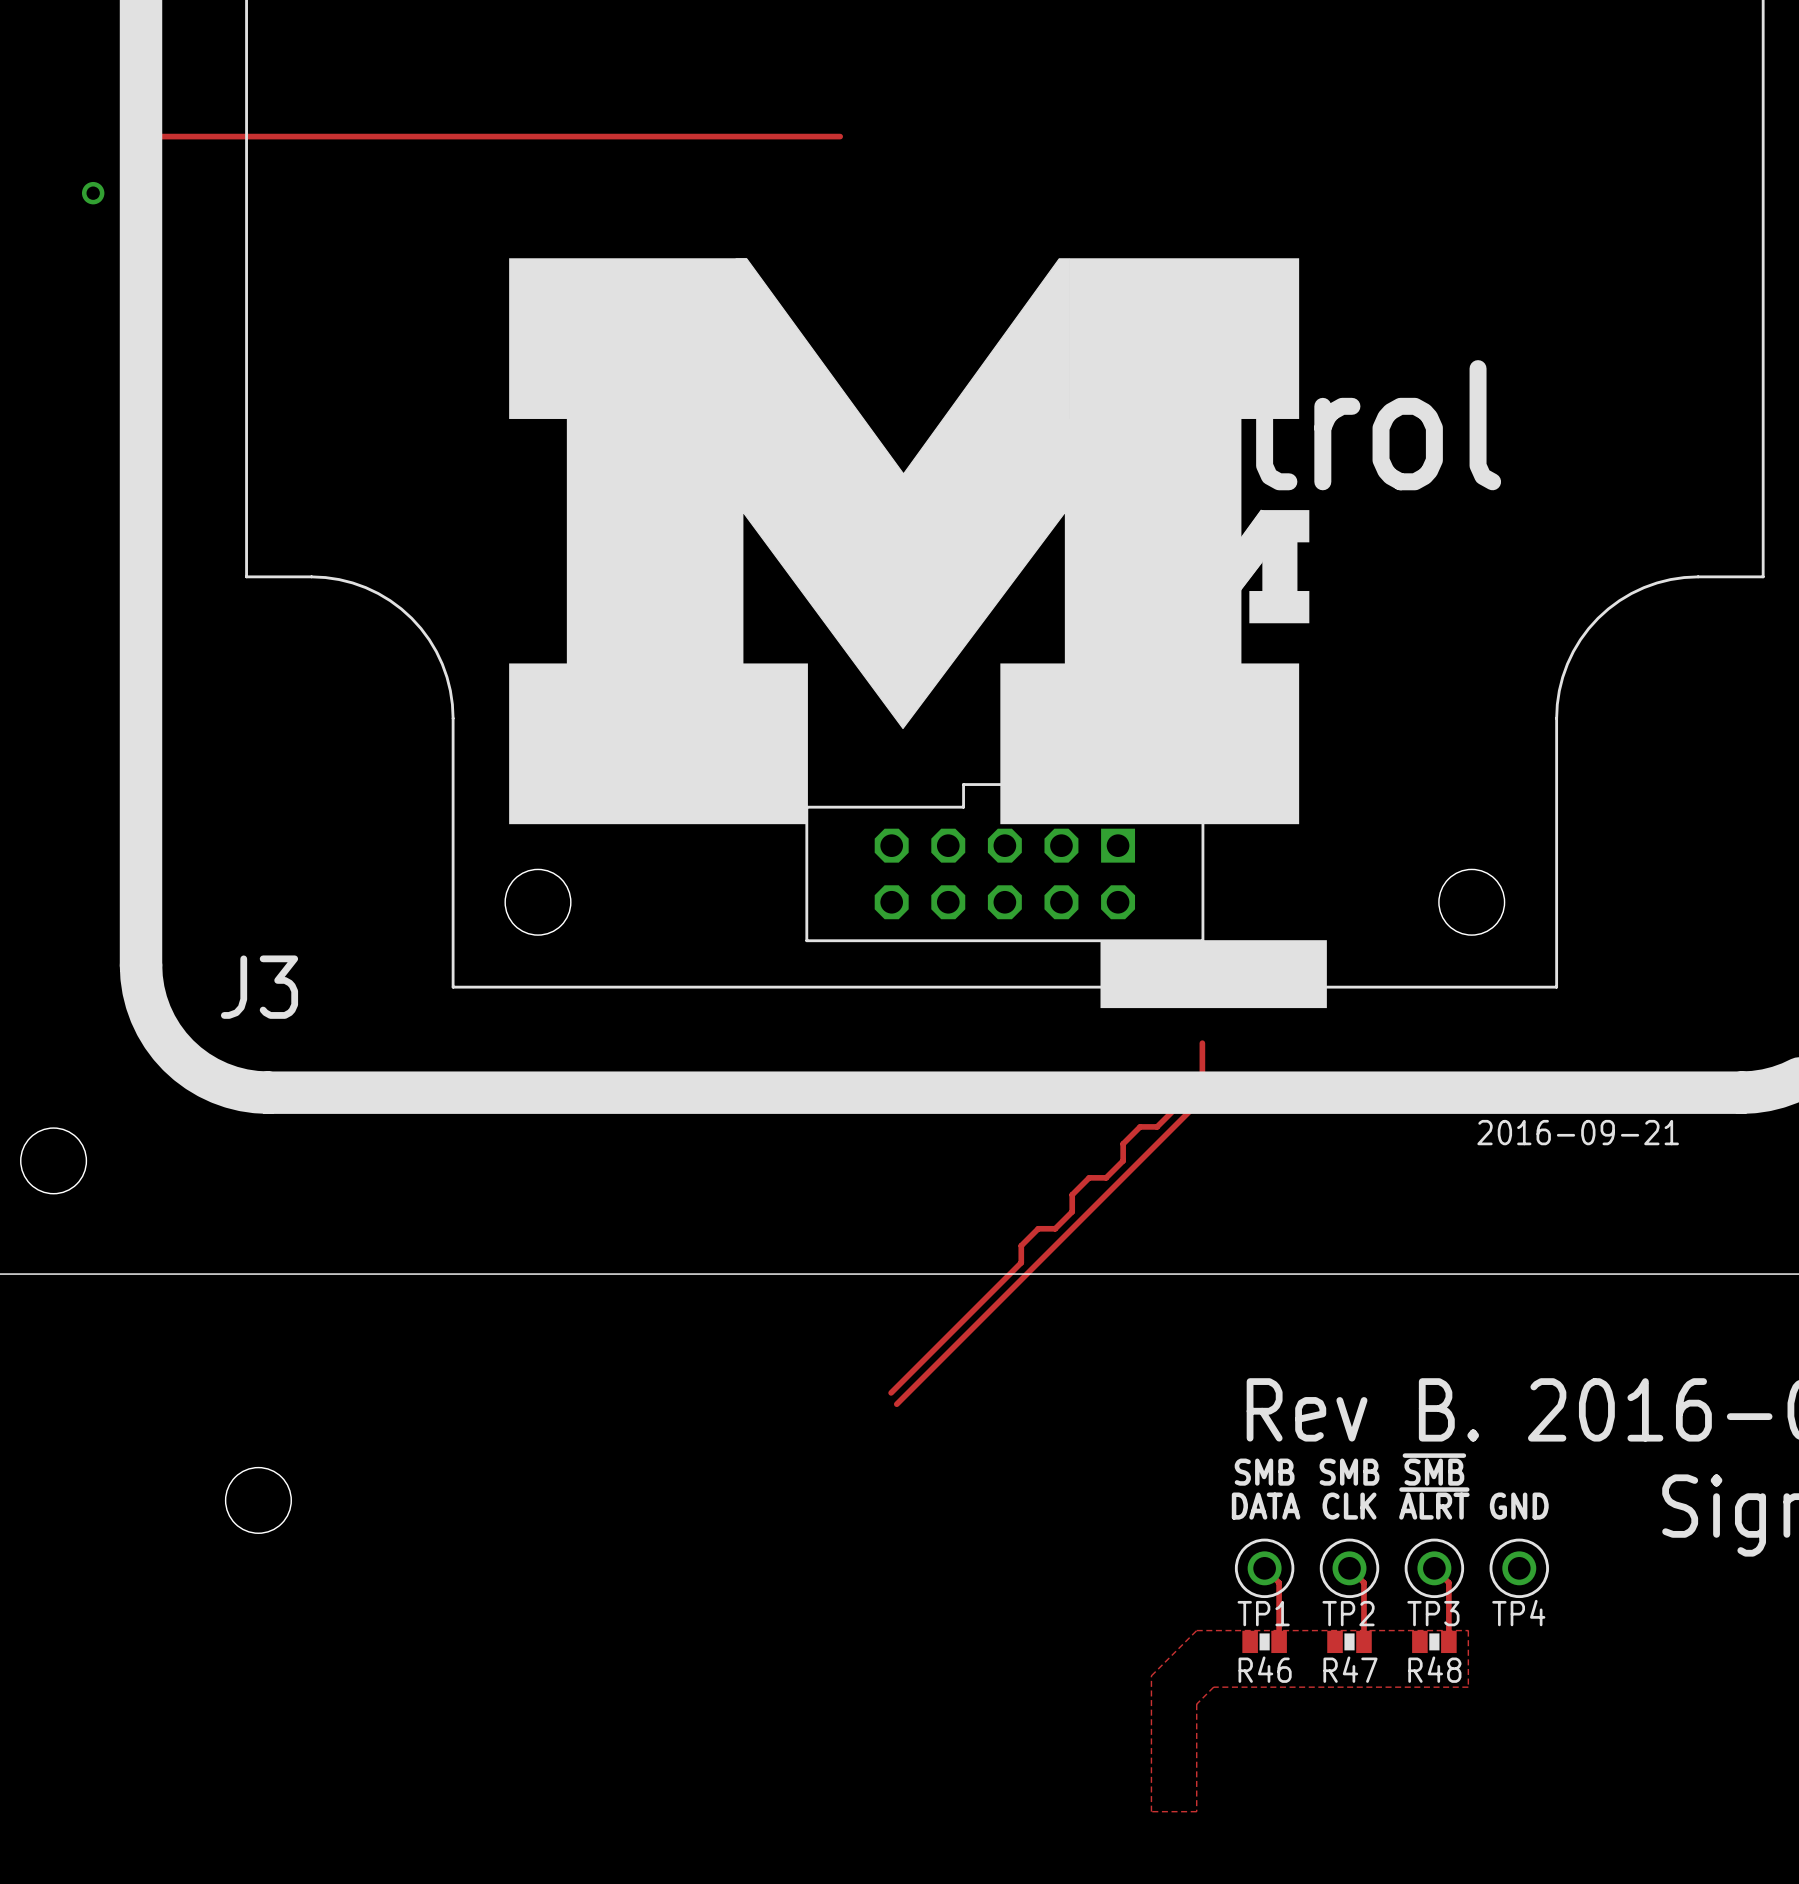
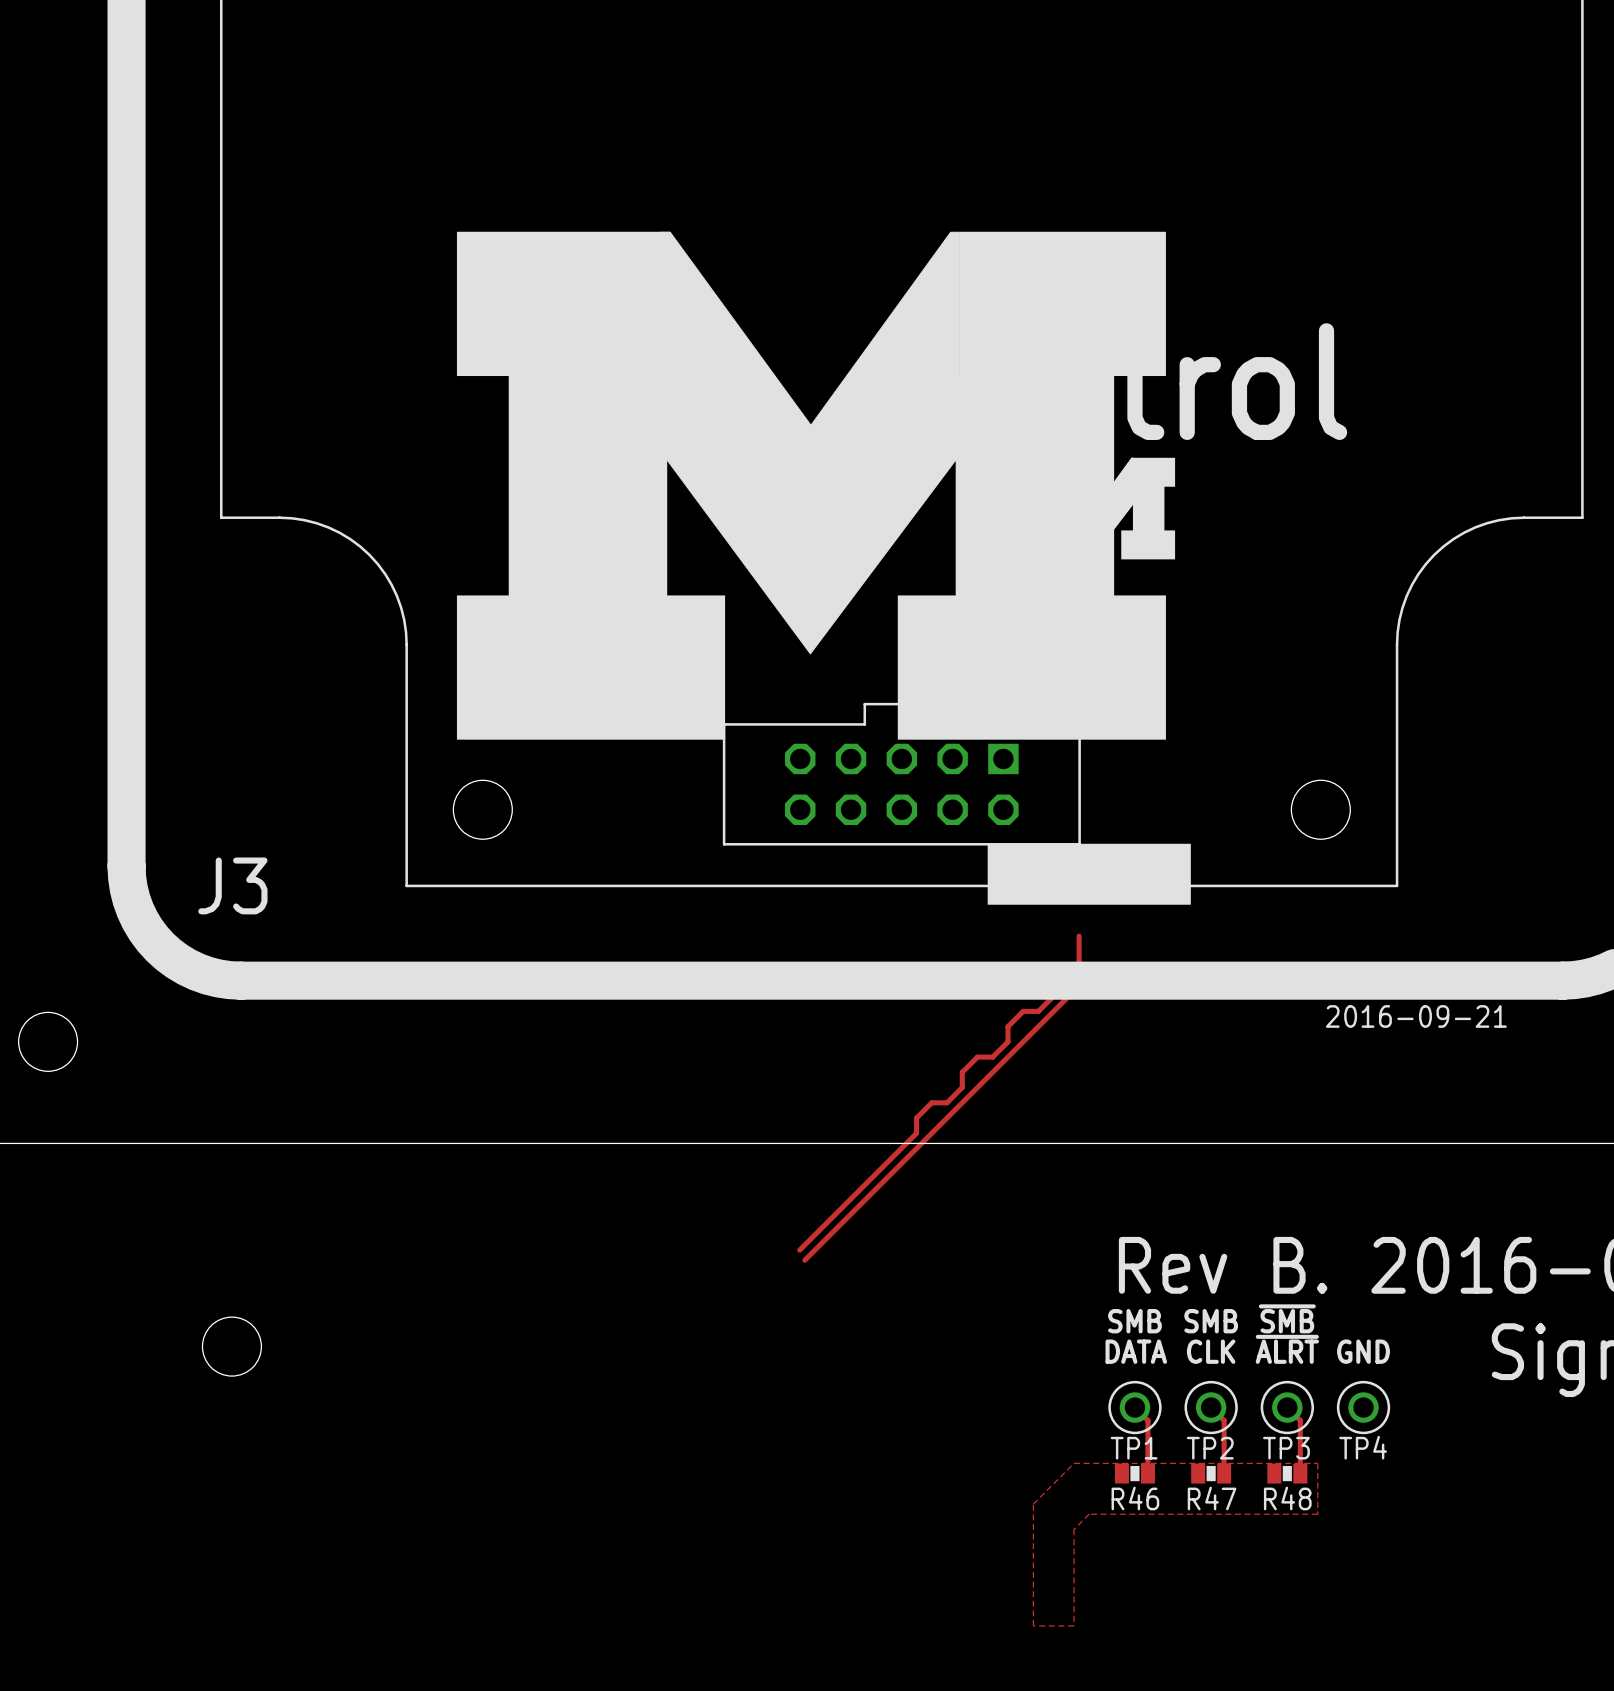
track: (840, 136) (149, 136) (146, 139) -> none
via: (93, 193) -> none

